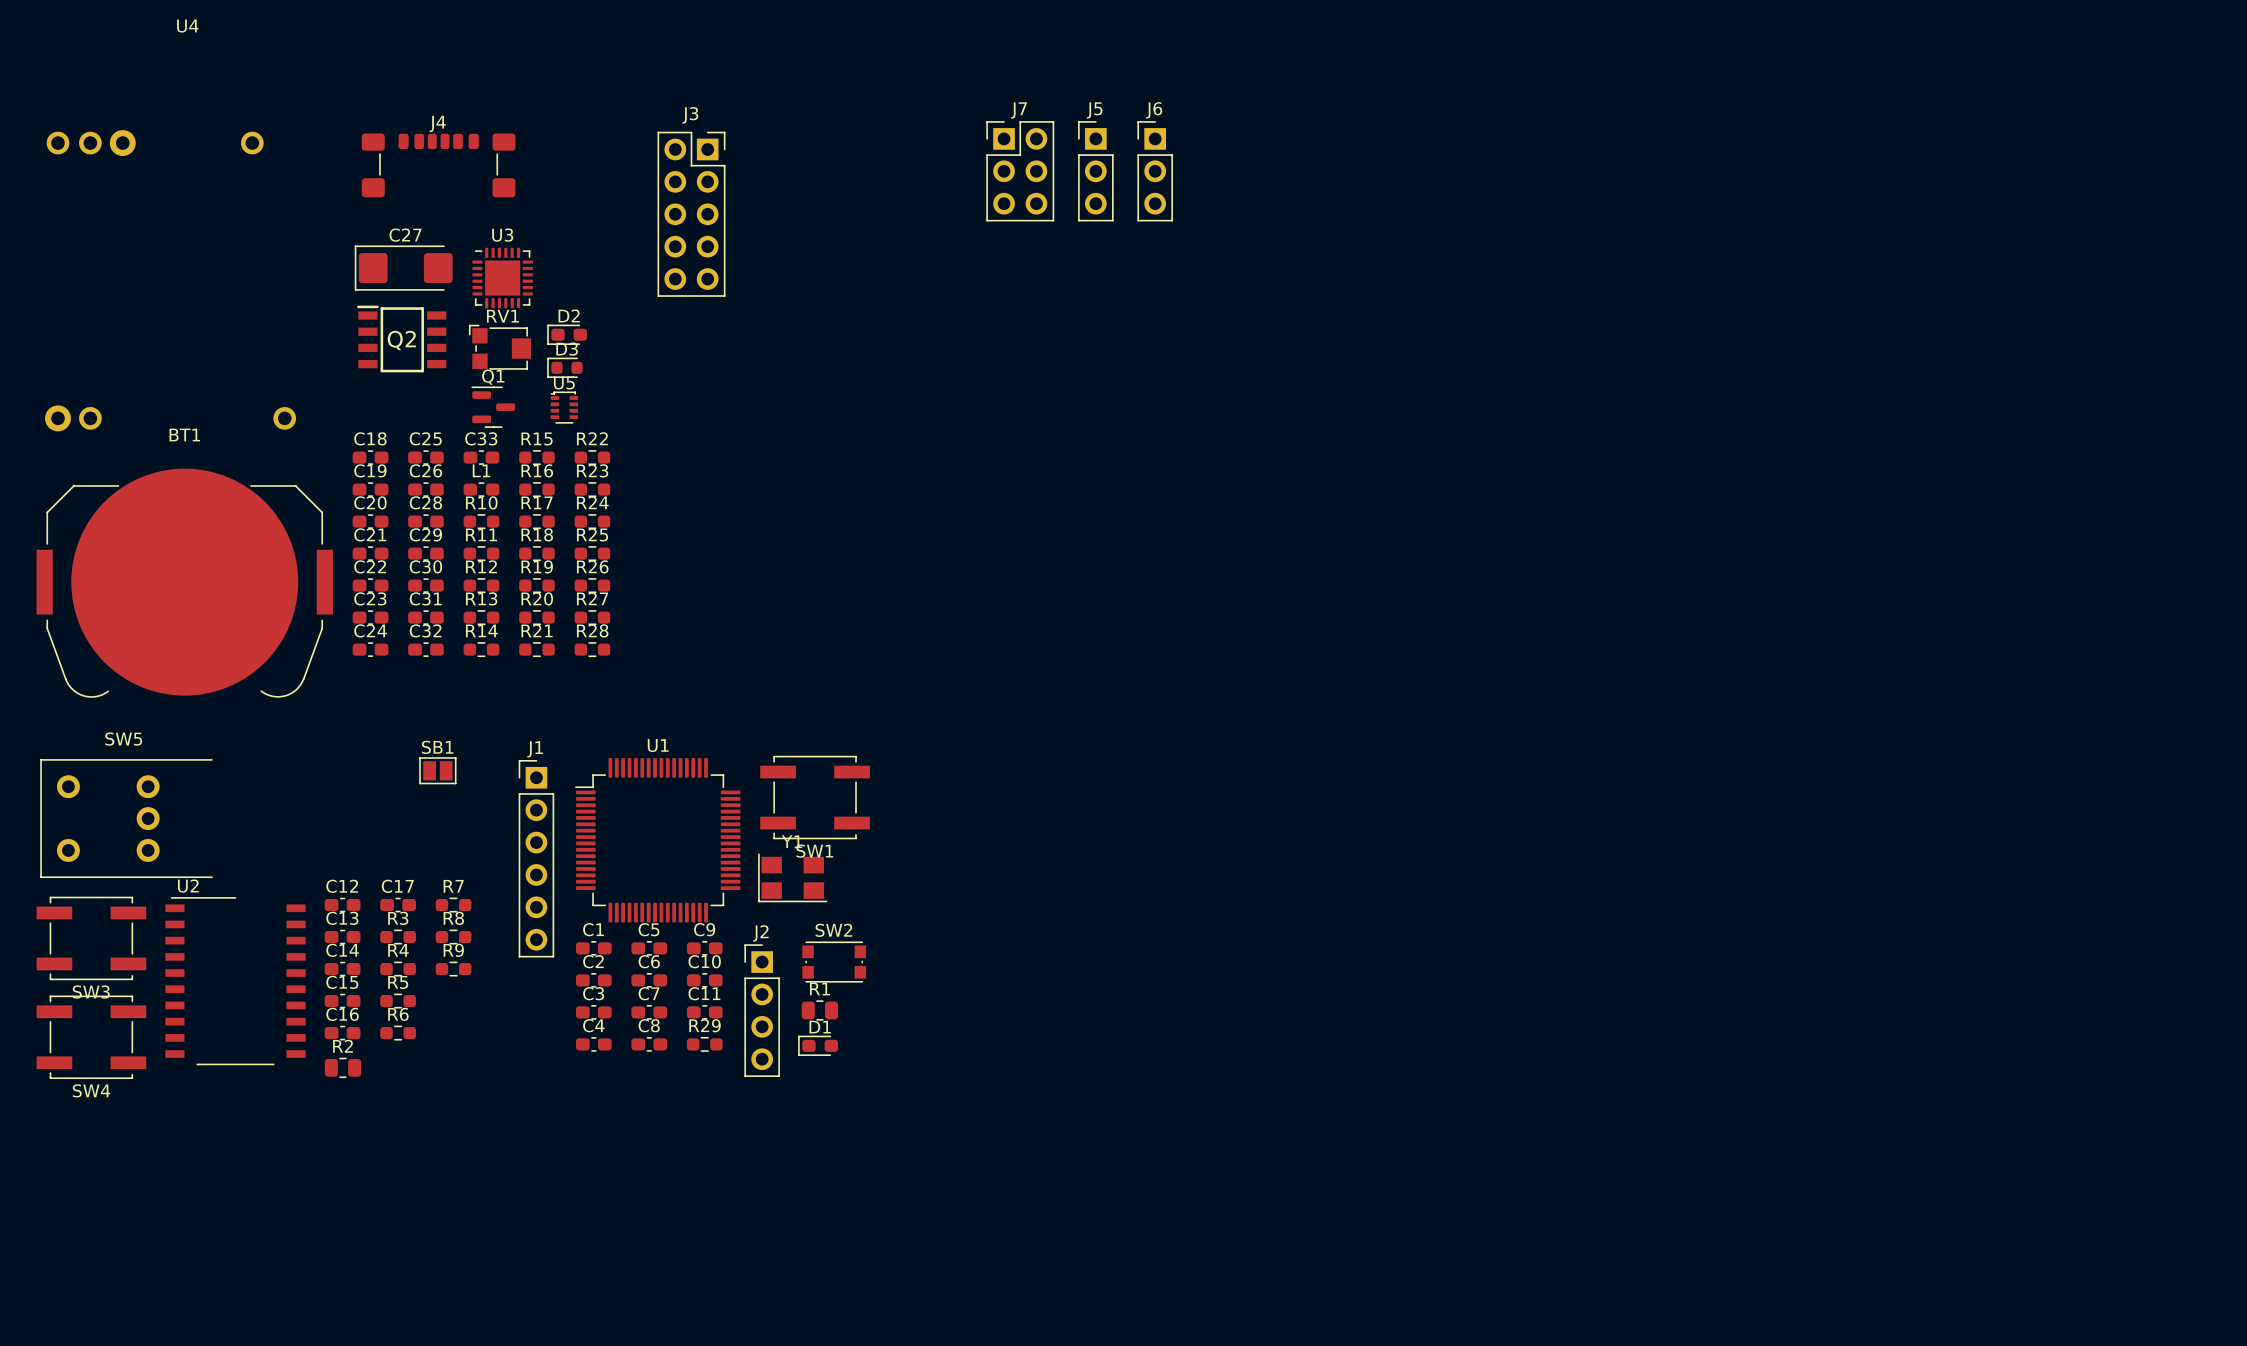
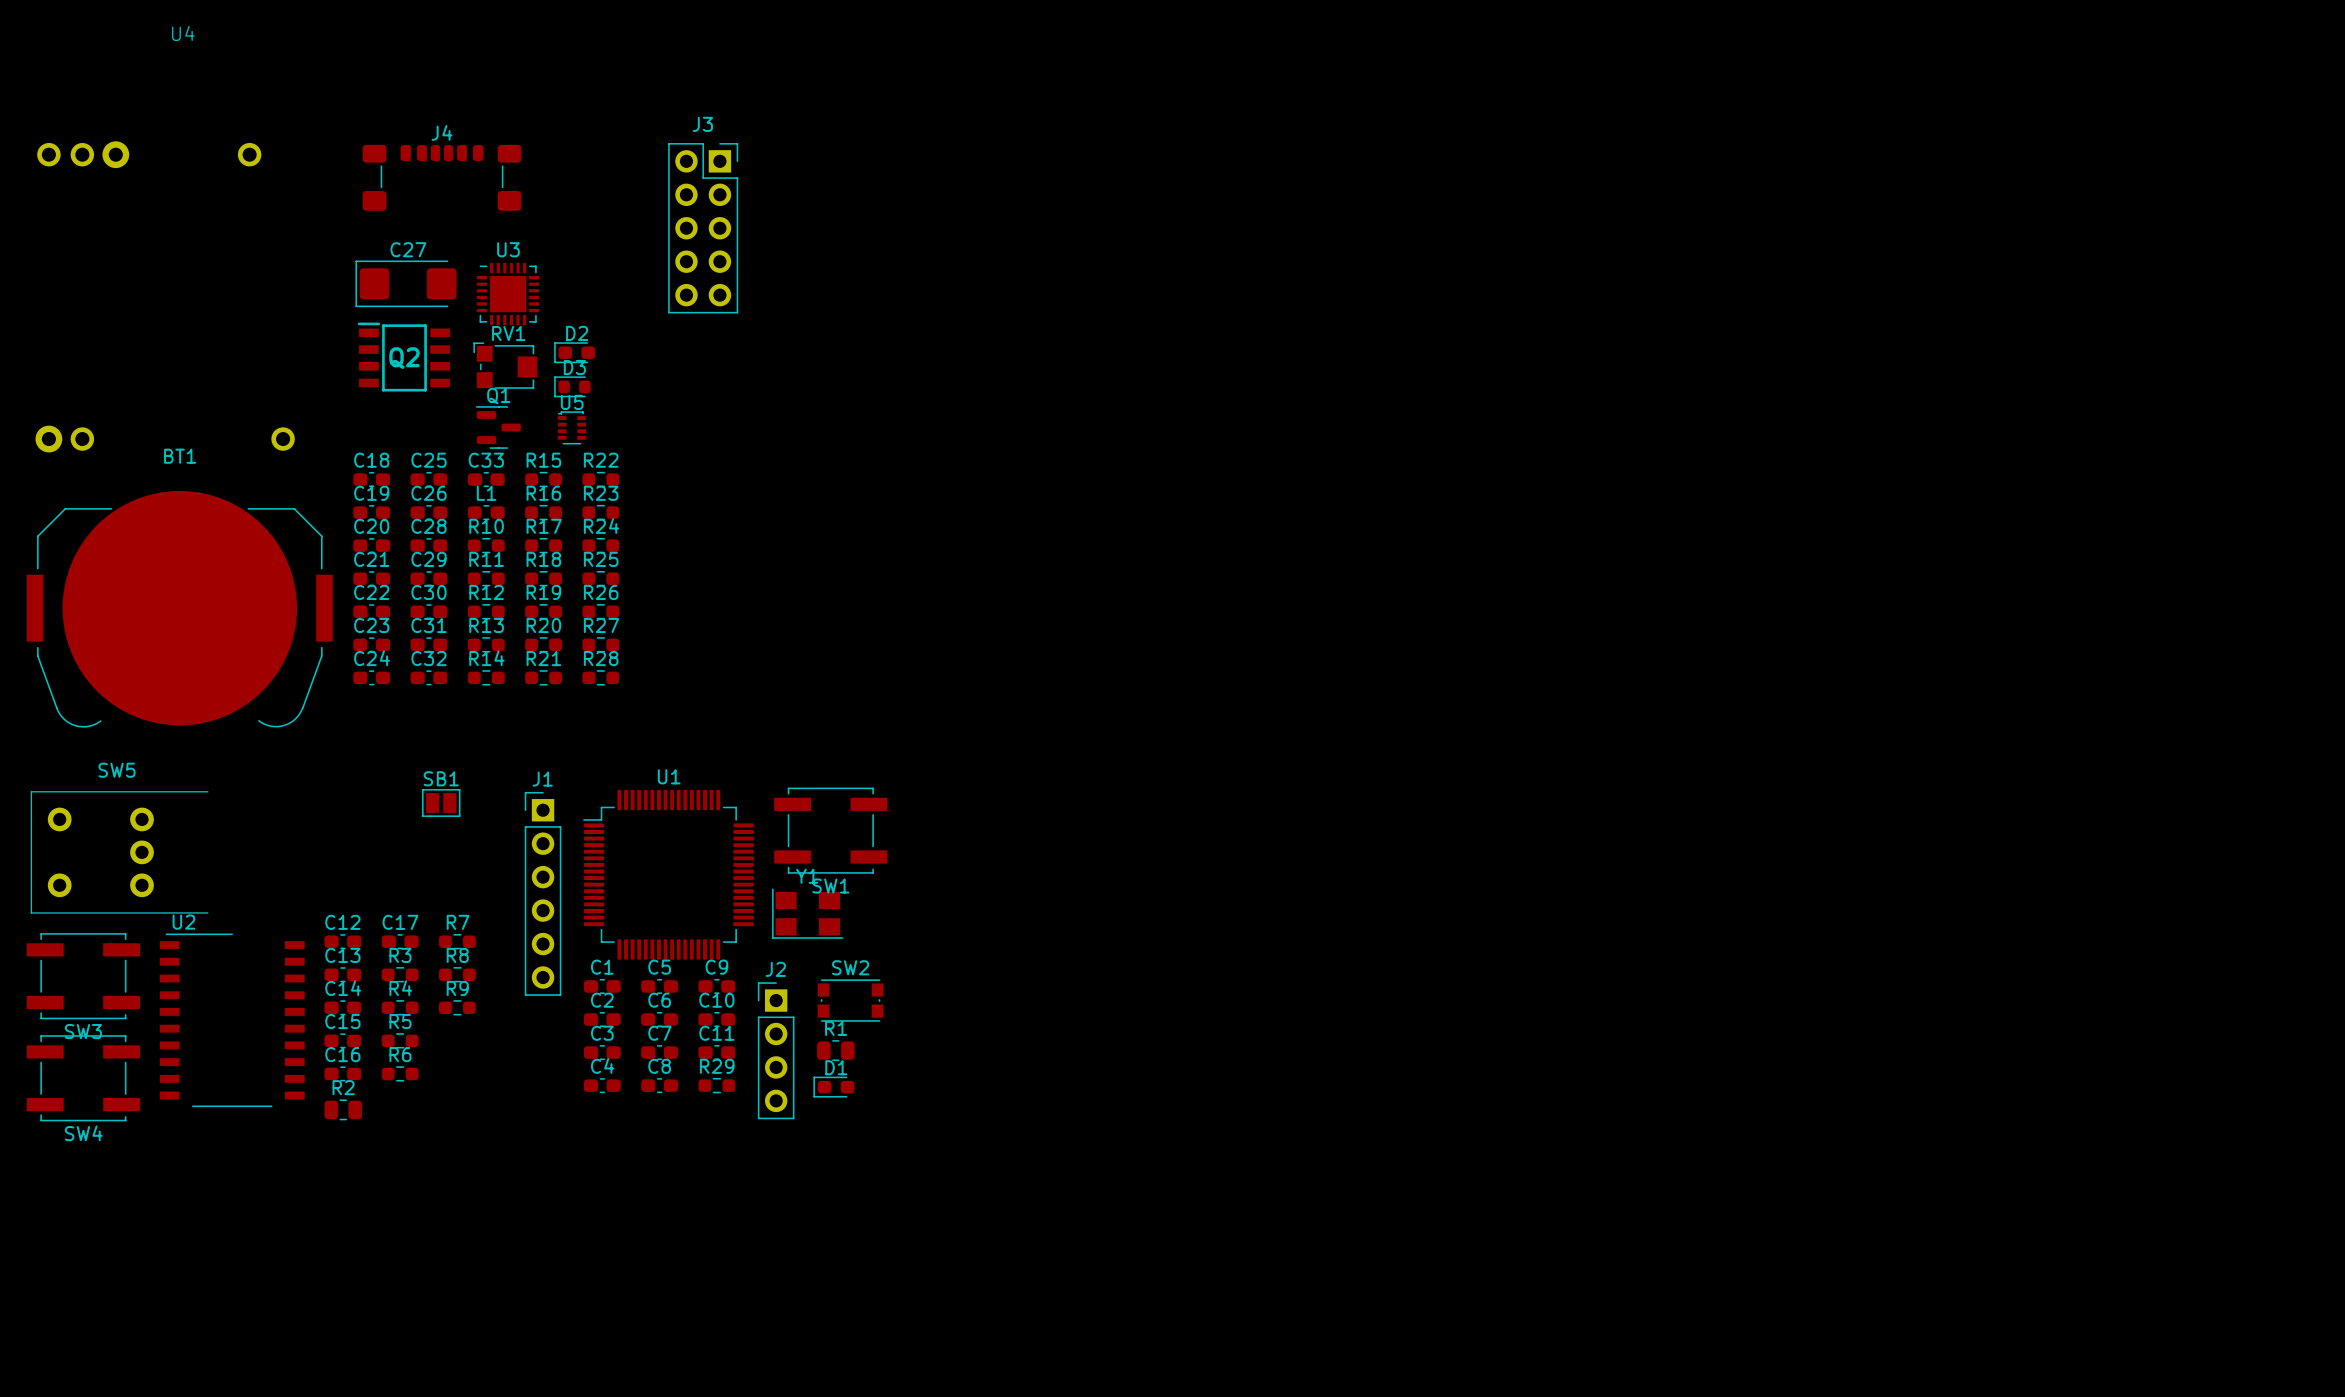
J7: (1020, 171) -> none
J5: (1095, 171) -> none
J6: (1155, 171) -> none

